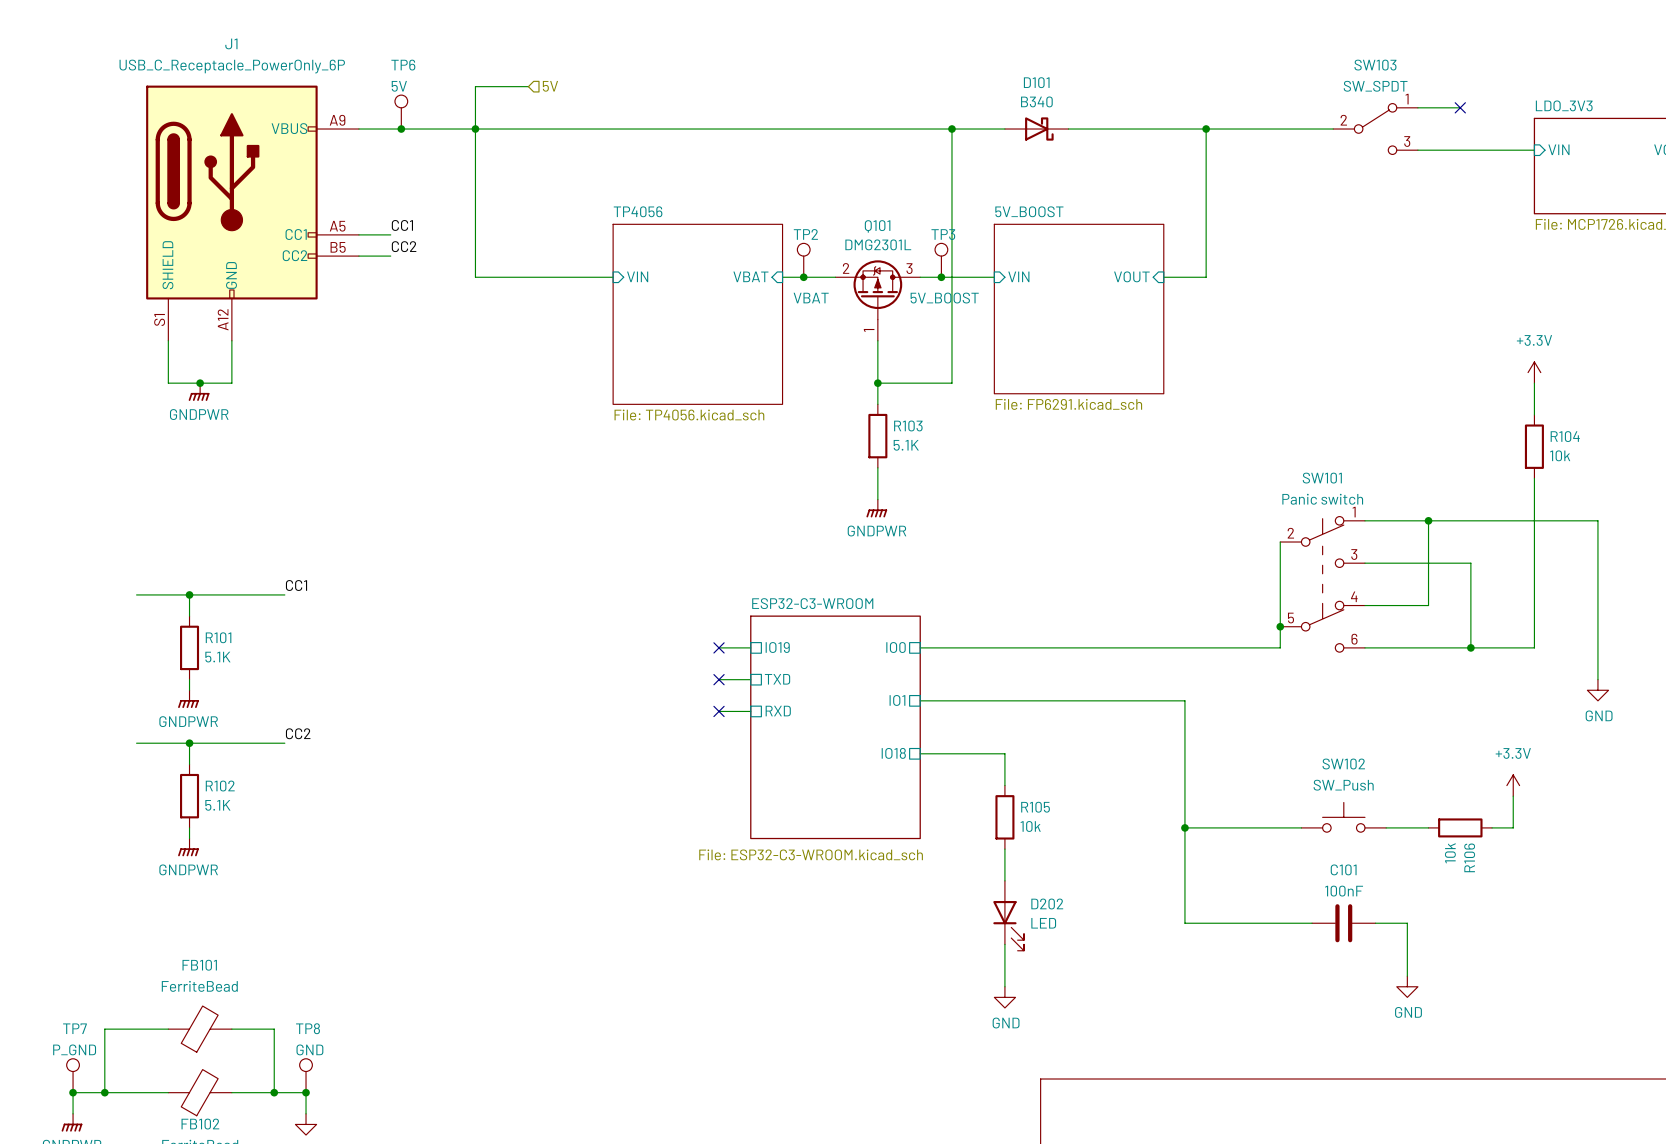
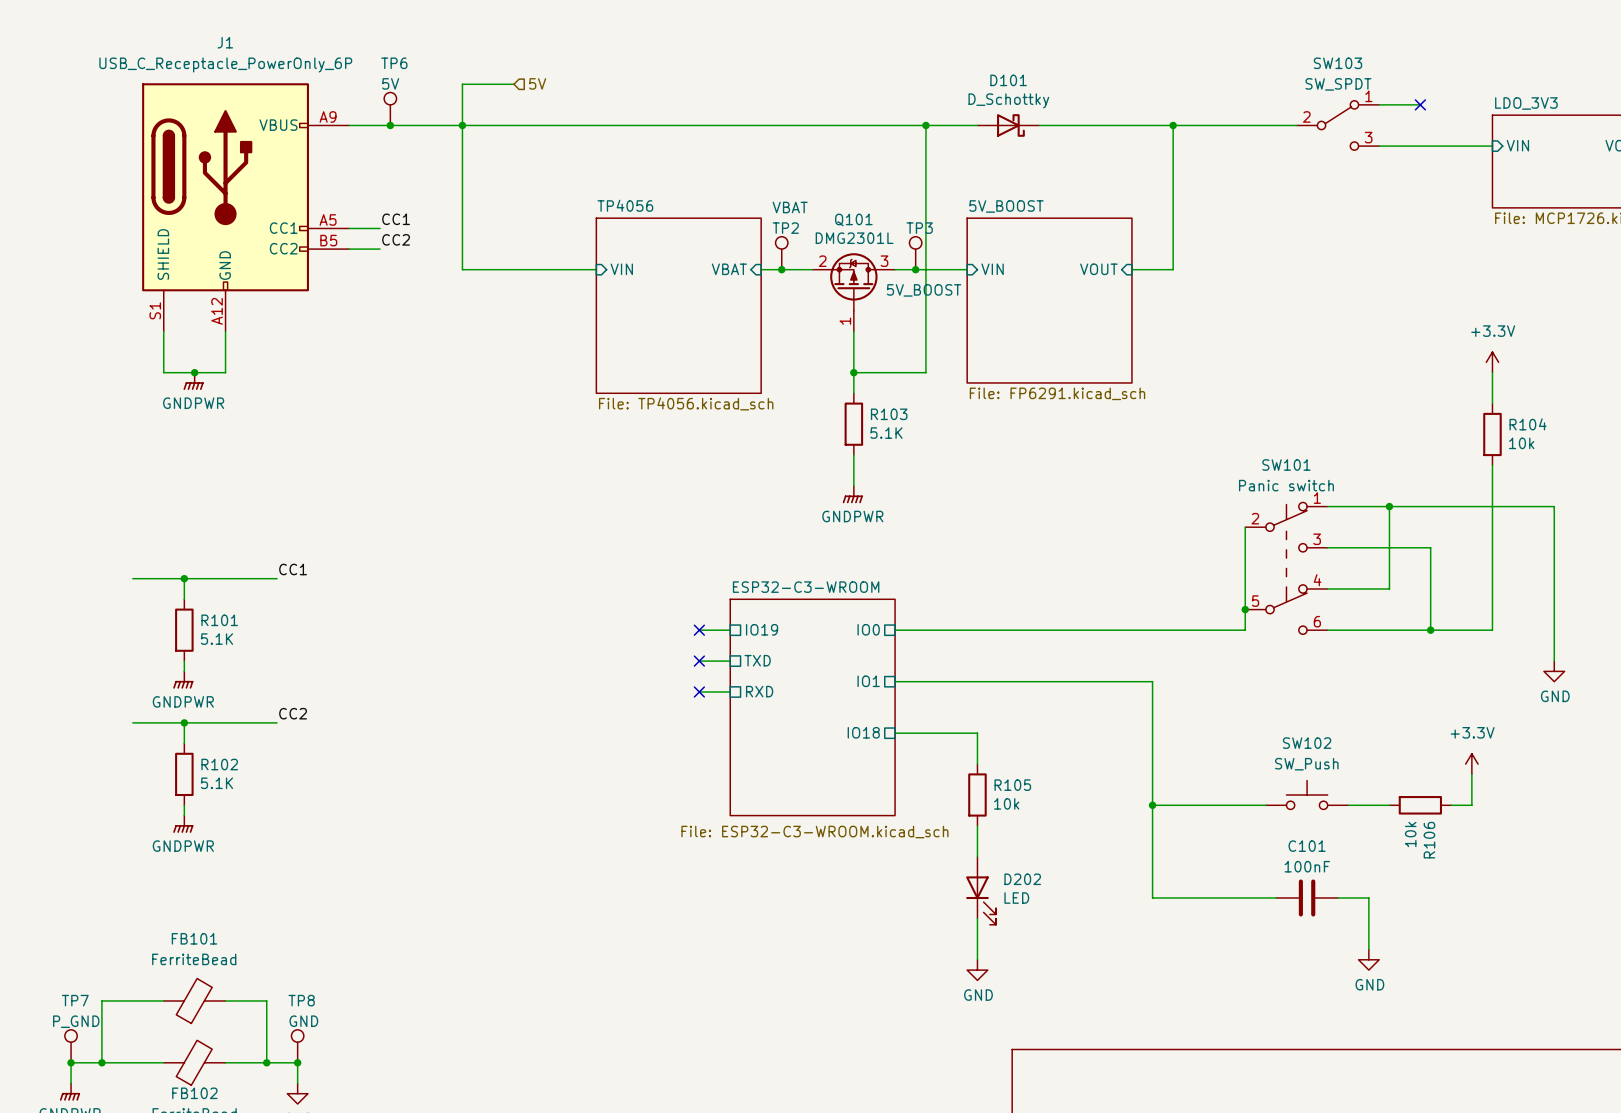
D101 value: B340 (1036, 101) -> D_Schottky (1008, 100)
TP2 value position: VBAT (811, 298) -> VBAT (790, 207)

